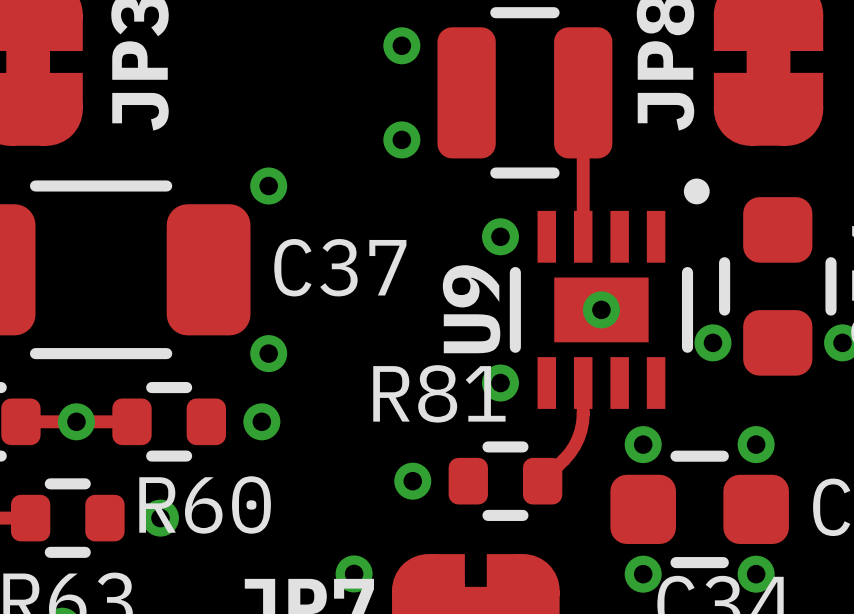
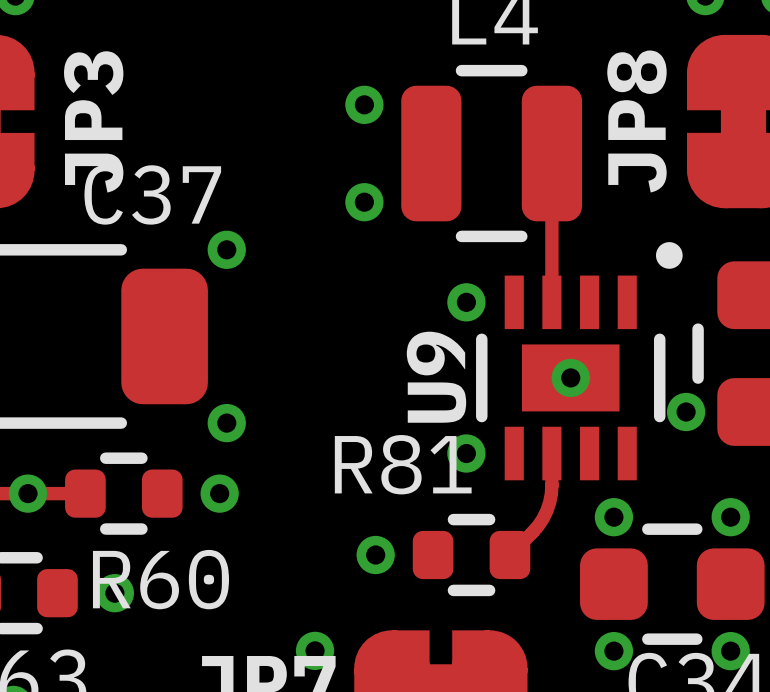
C37 name position: C37 (340, 267) -> C37 (152, 194)

